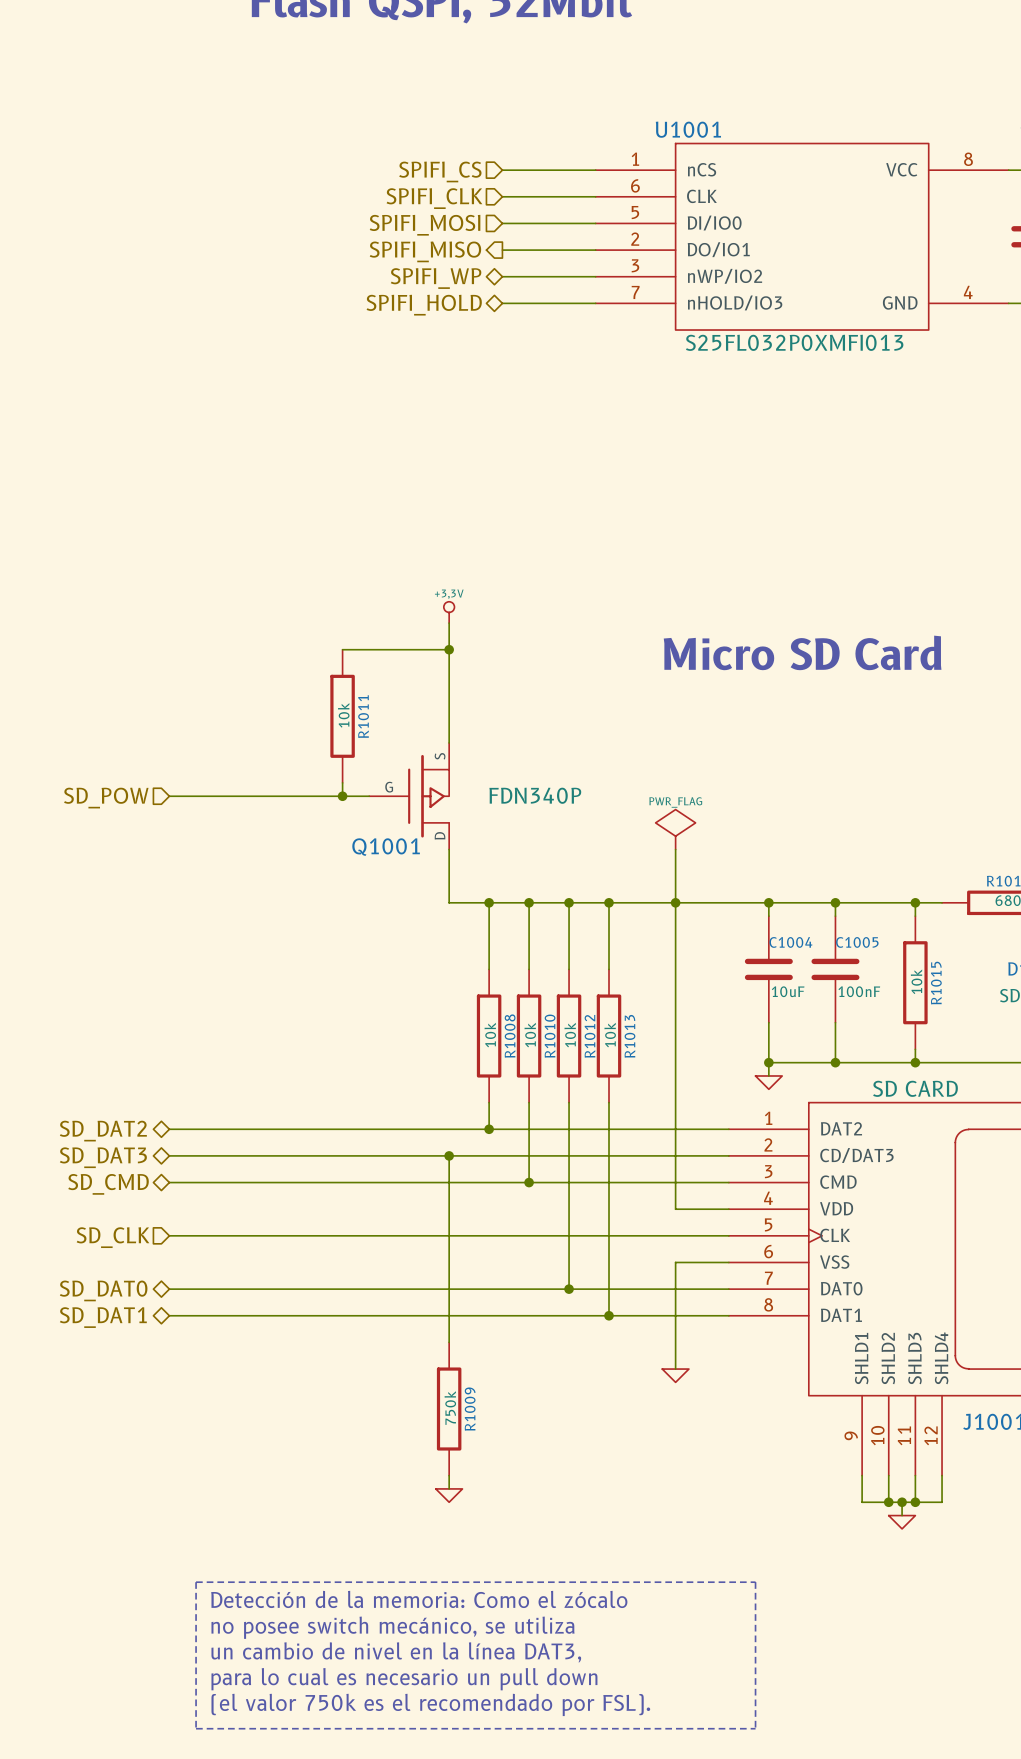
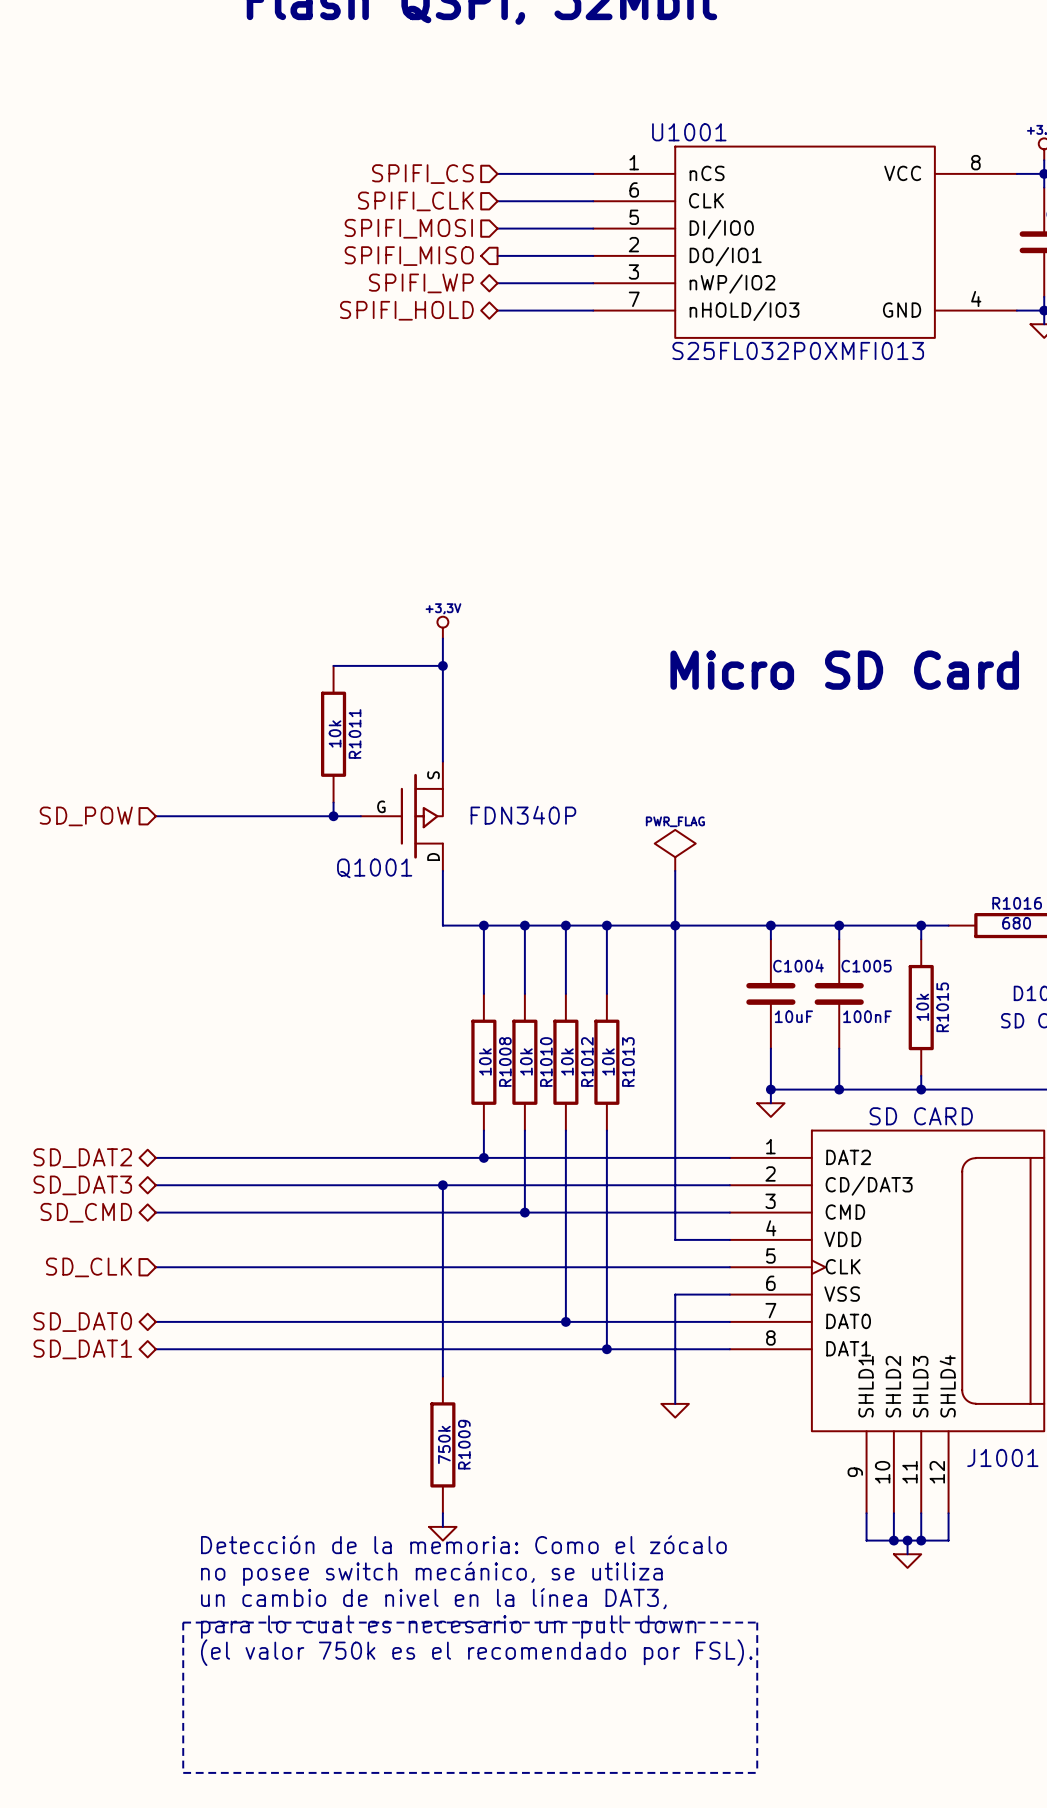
text position: Detección de la memoria: Como el zócalo (419, 1599) -> Detección de la memoria: Como el zócalo (463, 1544)
text position: no posee switch mecánico, se utiliza (392, 1627) -> no posee switch mecánico, se utiliza (431, 1573)
text position: un cambio de nivel en la línea DAT3, (396, 1652) -> un cambio de nivel en la línea DAT3, (433, 1598)
text position: para lo cual es necesario un pull down (404, 1679) -> para lo cual es necesario un pull down (448, 1627)
text position: (el valor 750k es el recomendado por FSL). (430, 1704) -> (el valor 750k es el recomendado por FSL). (476, 1652)

